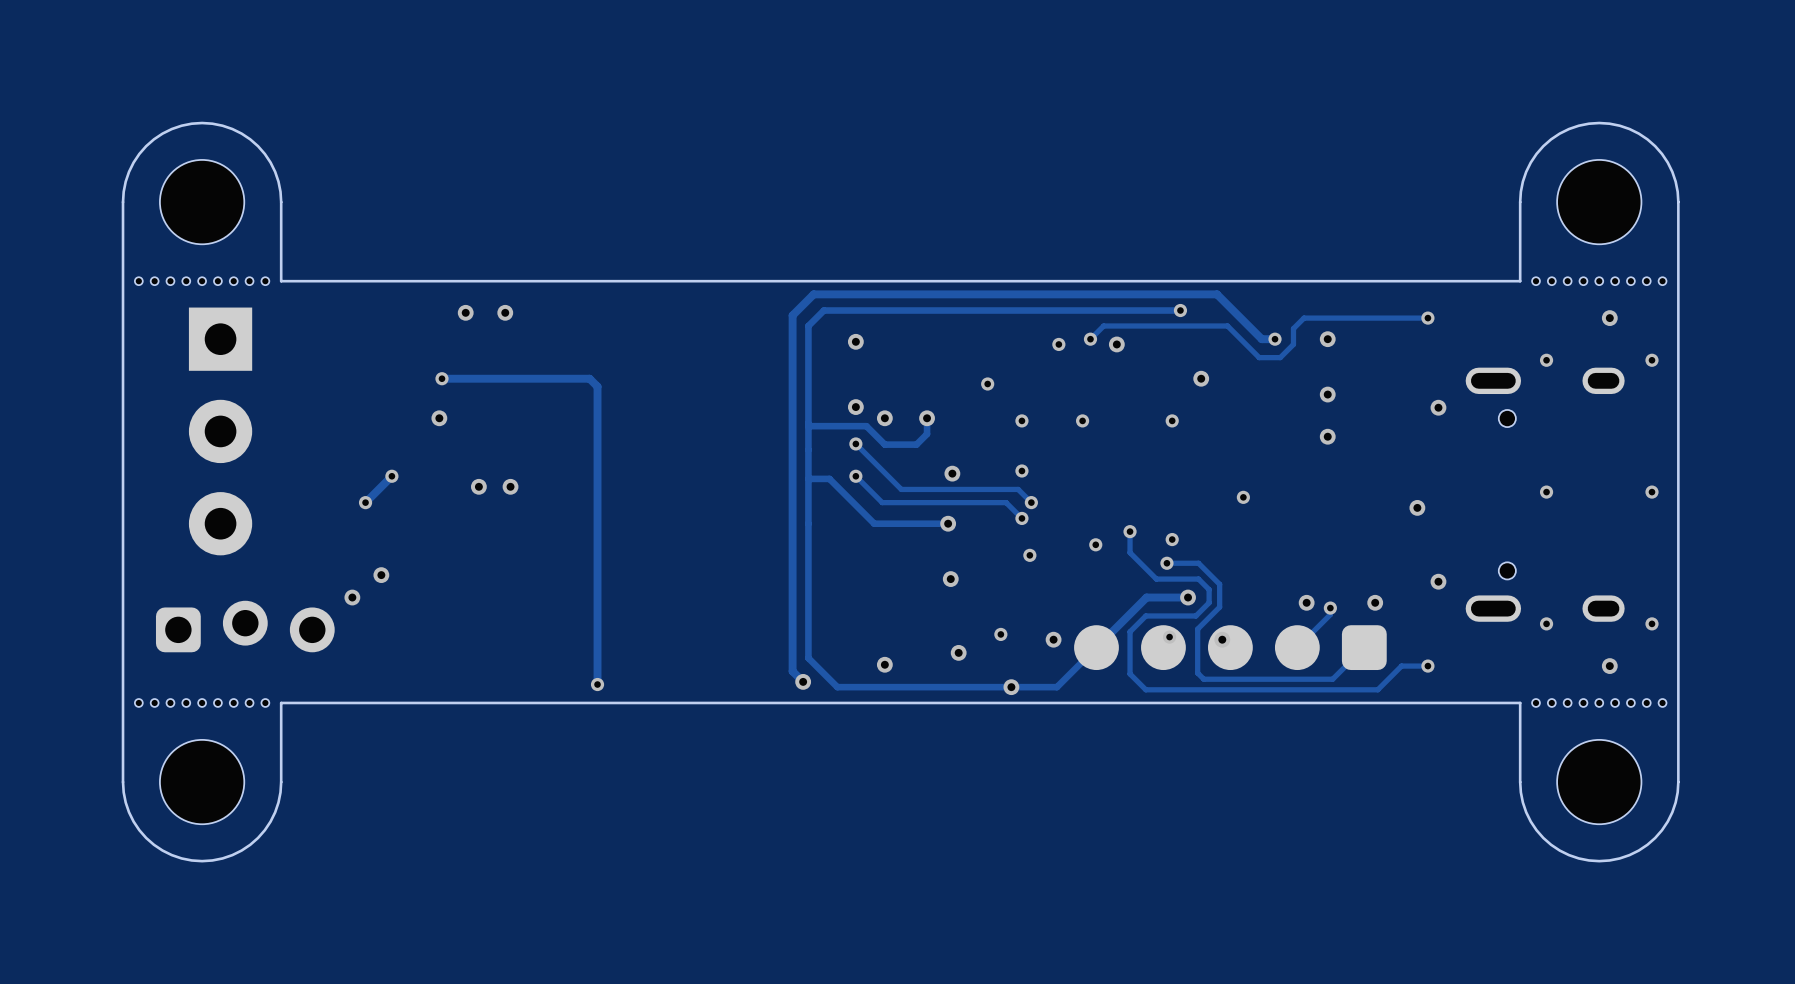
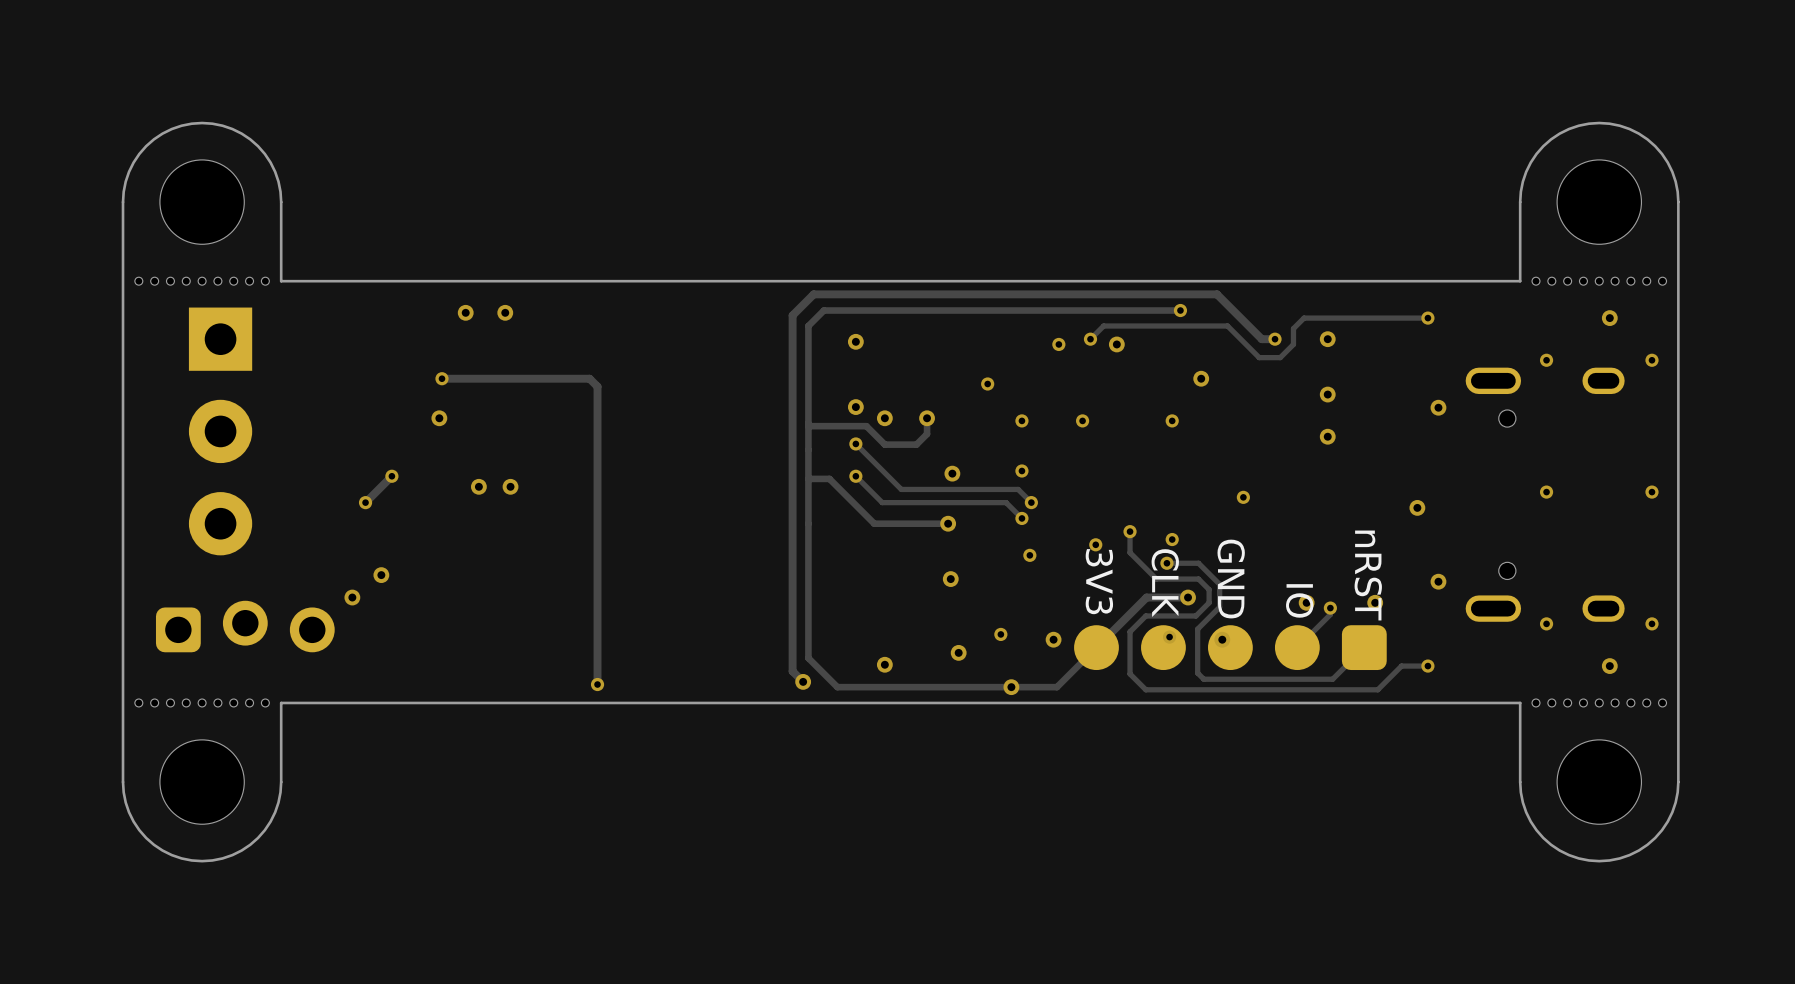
text: none -> nRST (1368, 575)
text: none -> GND (1231, 579)
text: none -> 3V3 (1099, 581)
text: none -> CLK (1165, 583)
text: none -> IO (1299, 600)

